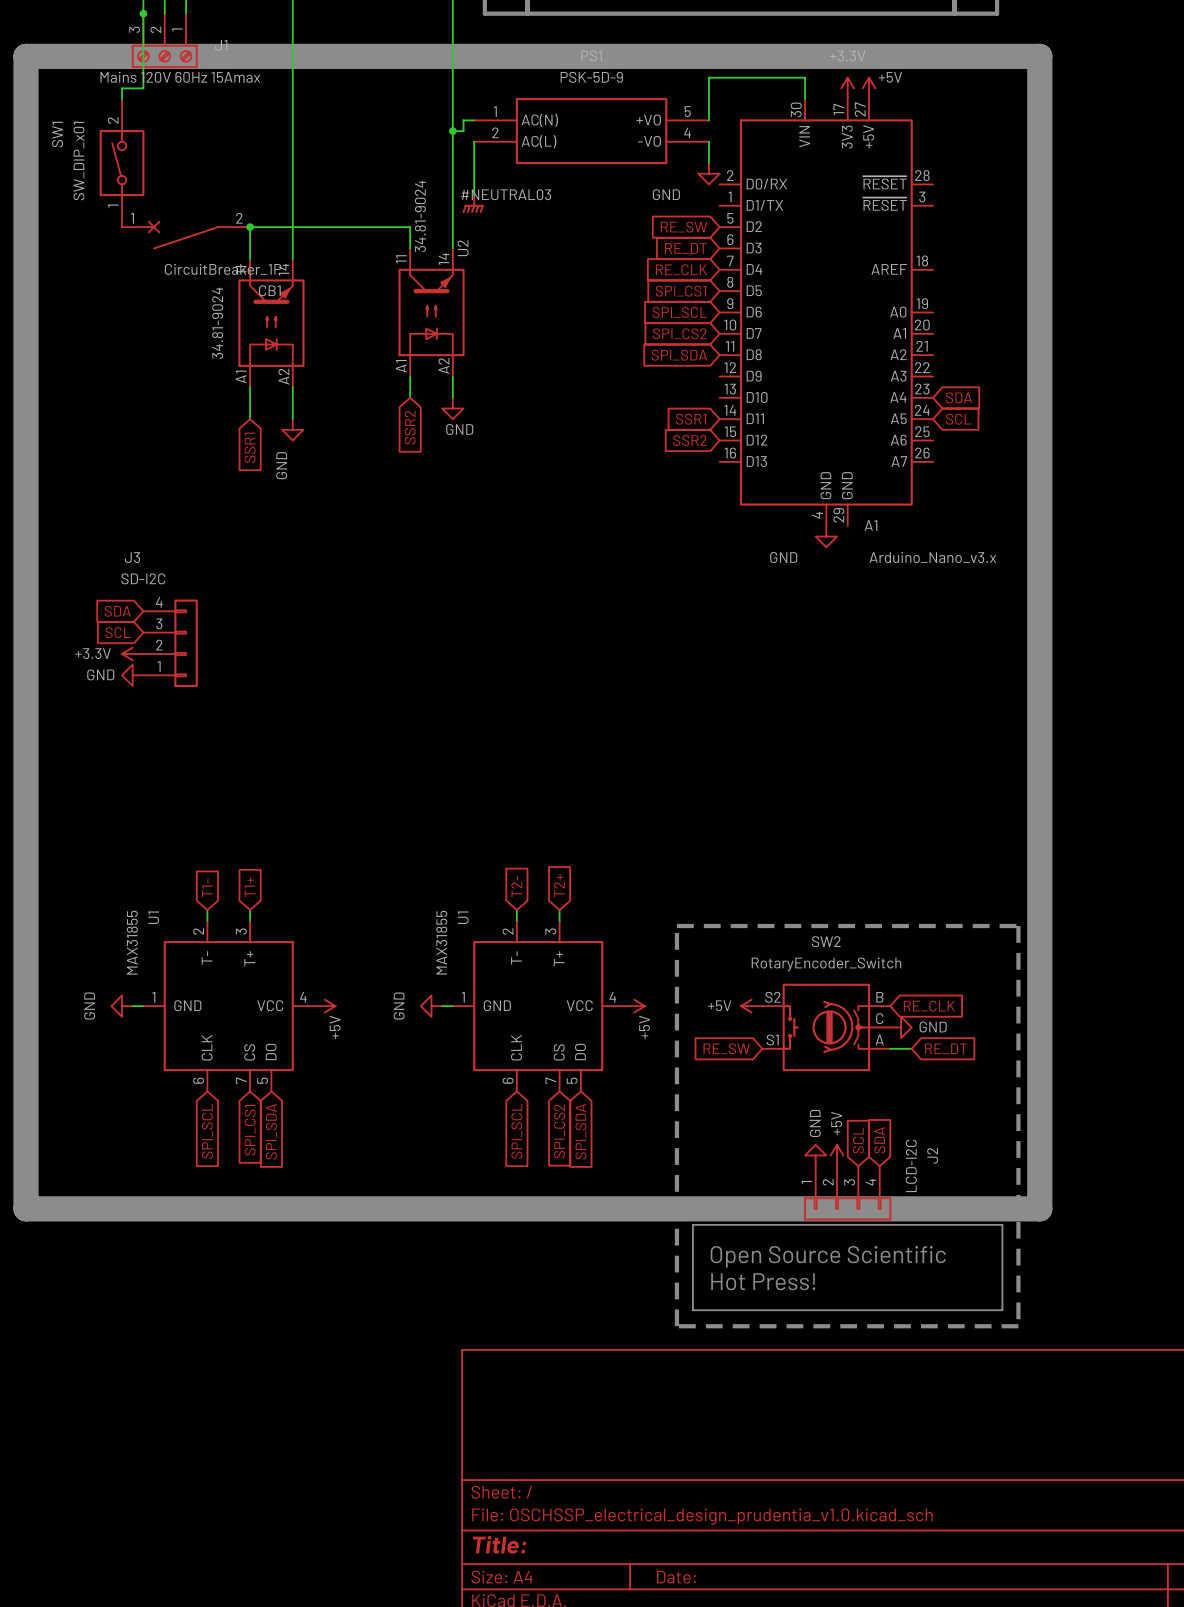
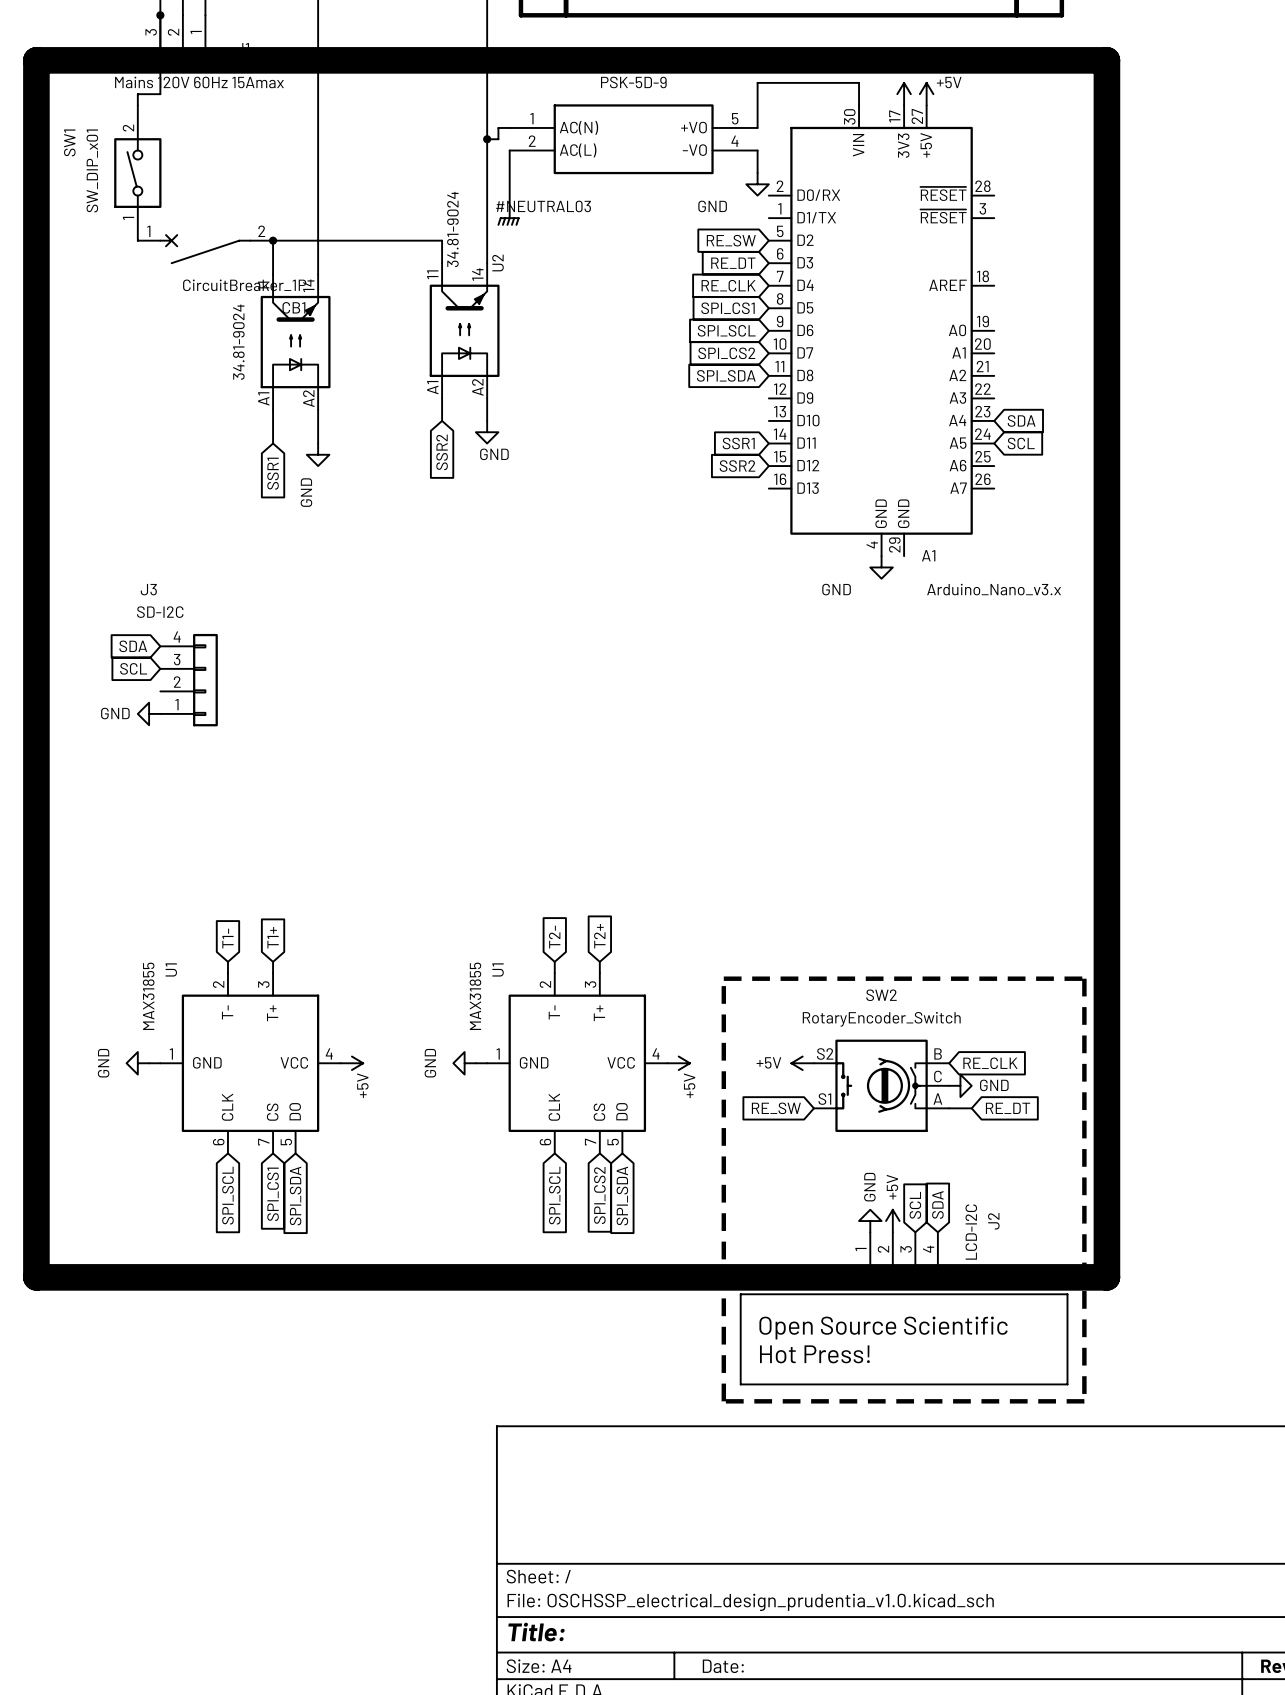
power symbol: +3.3V (132, 653) -> none

